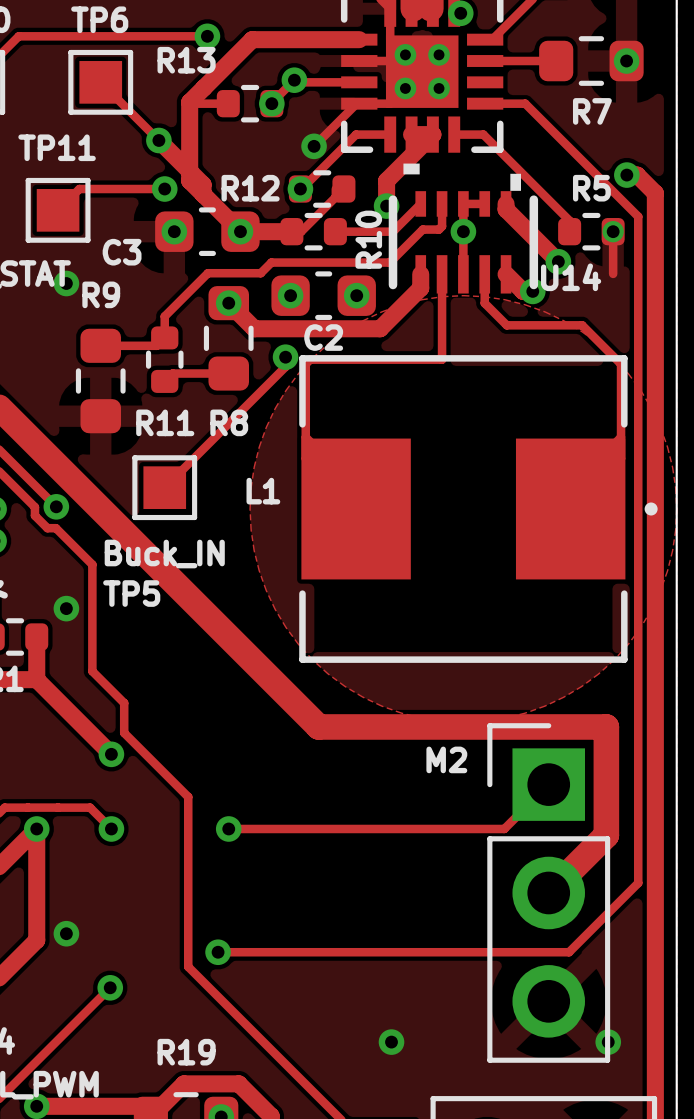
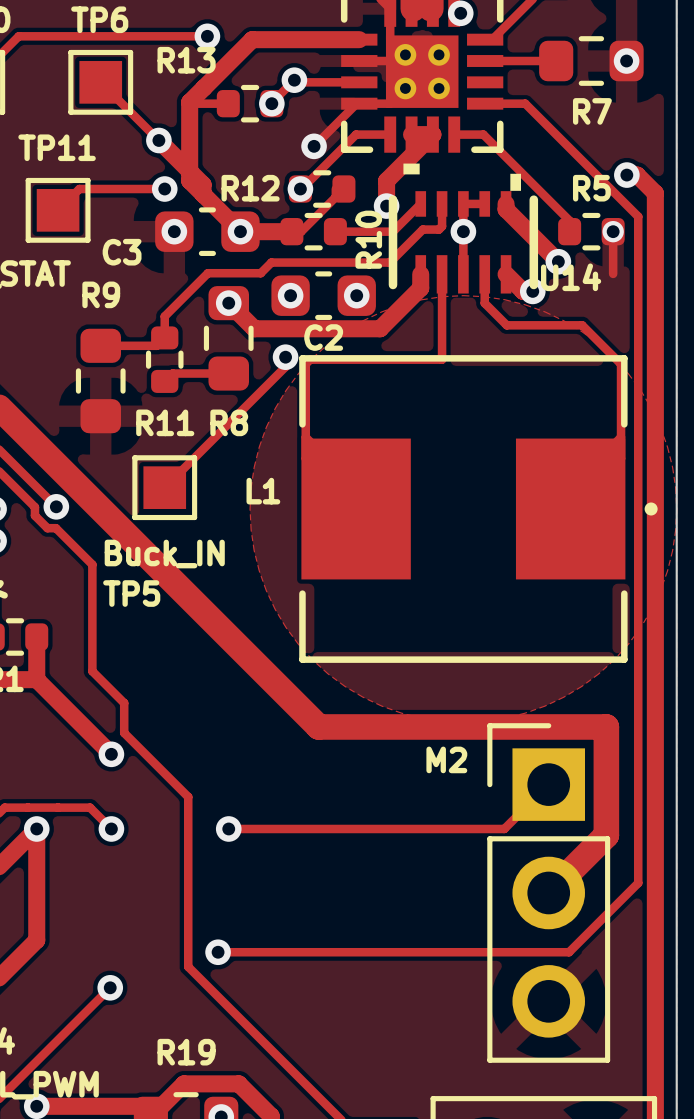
via: (66, 283) -> none
via: (66, 608) -> none
via: (66, 933) -> none
via: (391, 1042) -> none
via: (608, 1042) -> none

